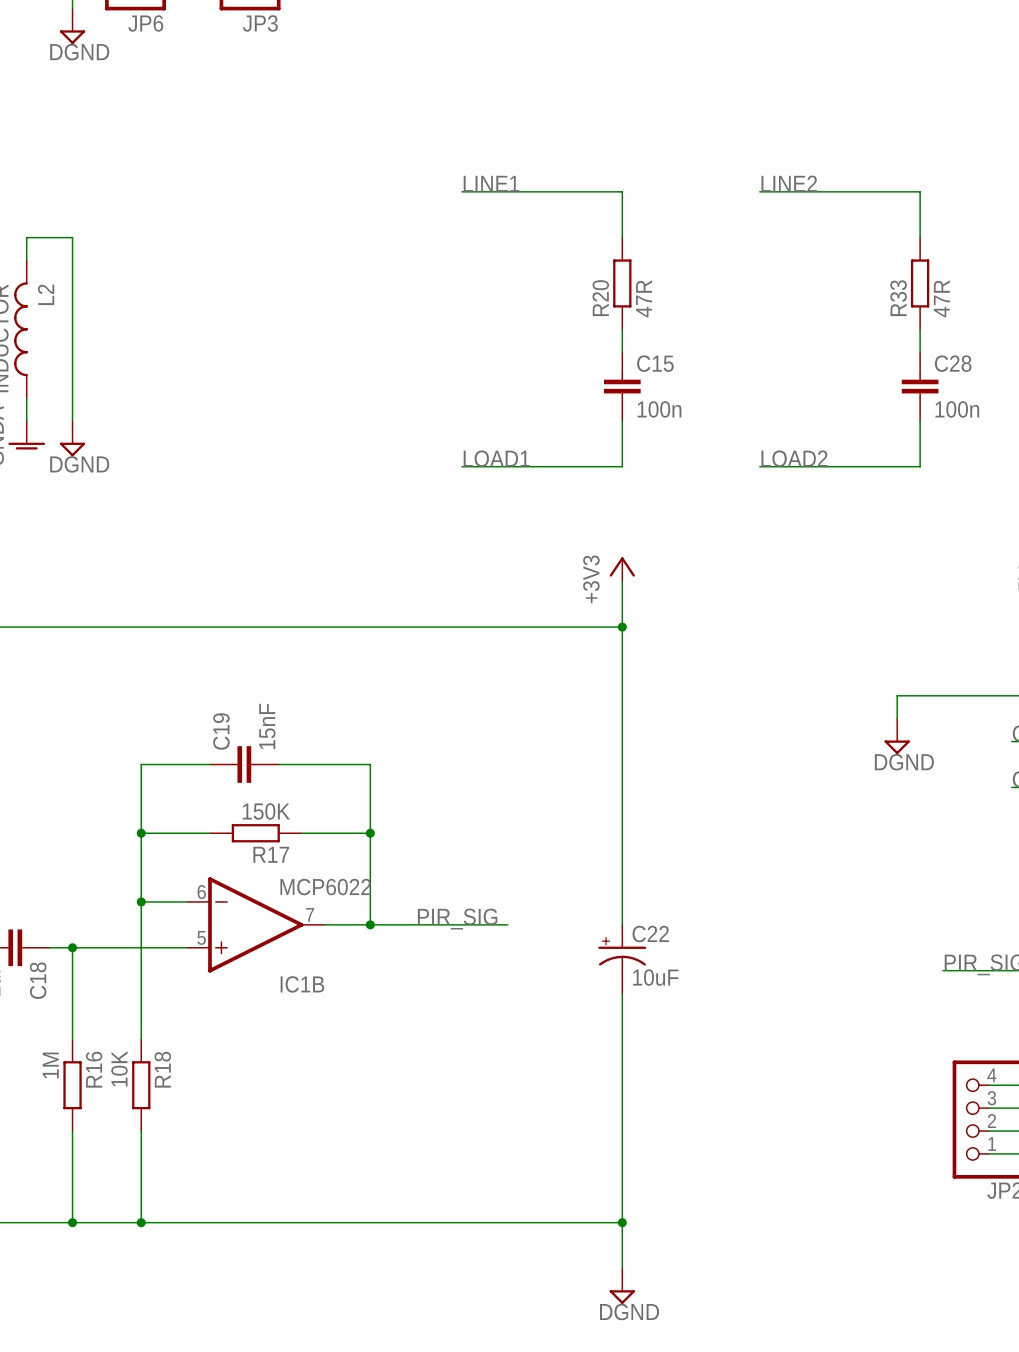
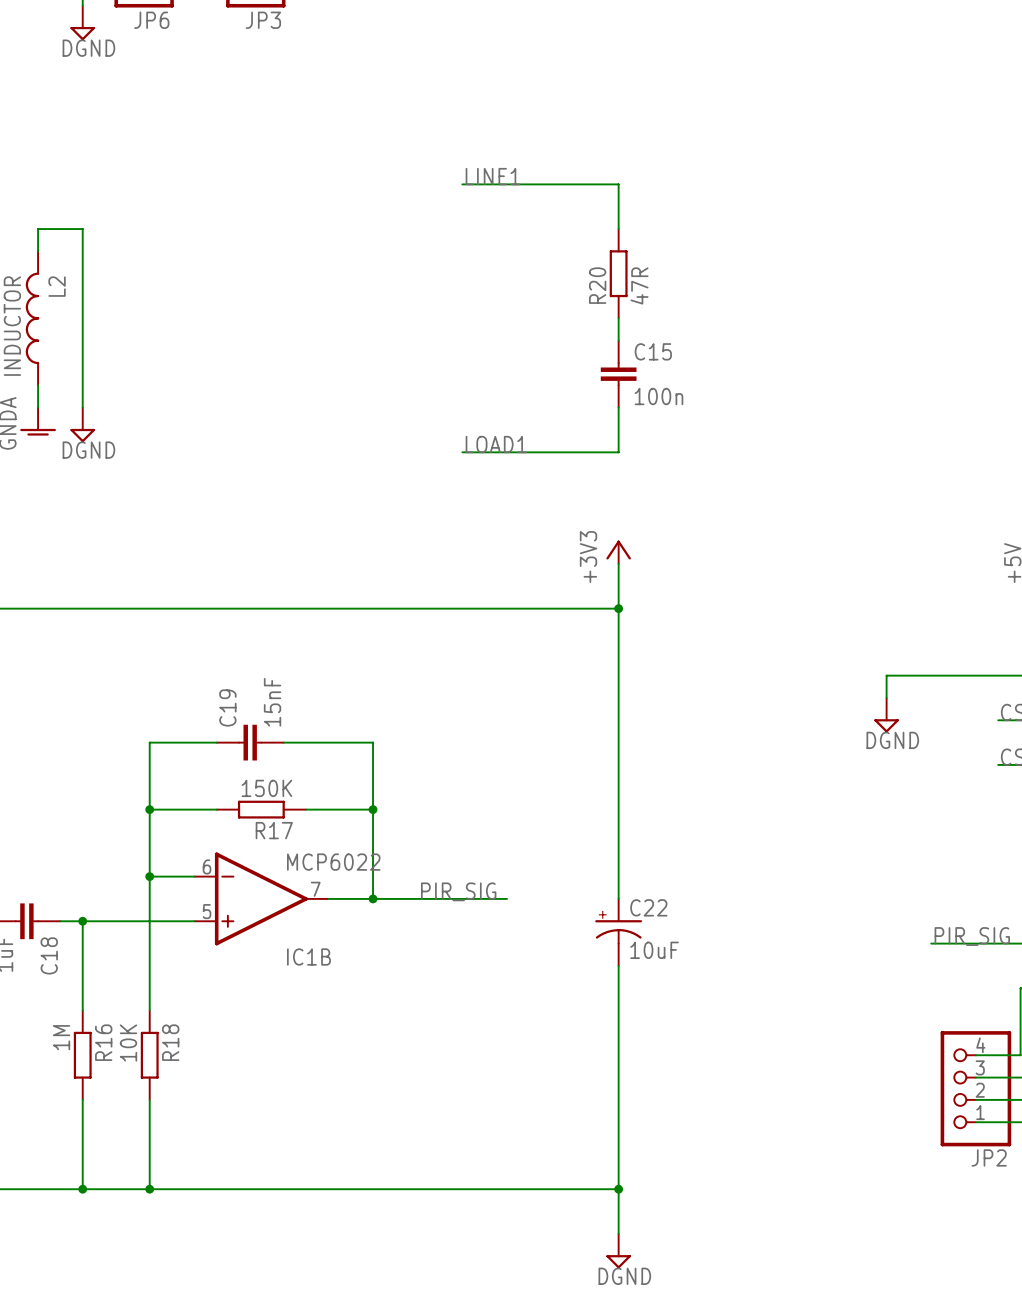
label: LINE2 (789, 183) -> none
wire: (759, 191) (920, 191) (920, 237) -> none
R33: 47R (920, 283) -> none
wire: (920, 329) (920, 352) -> none
C28: 100n (920, 386) -> none
wire: (920, 420) (920, 466) (759, 466) -> none
label: LOAD2 (794, 458) -> none

